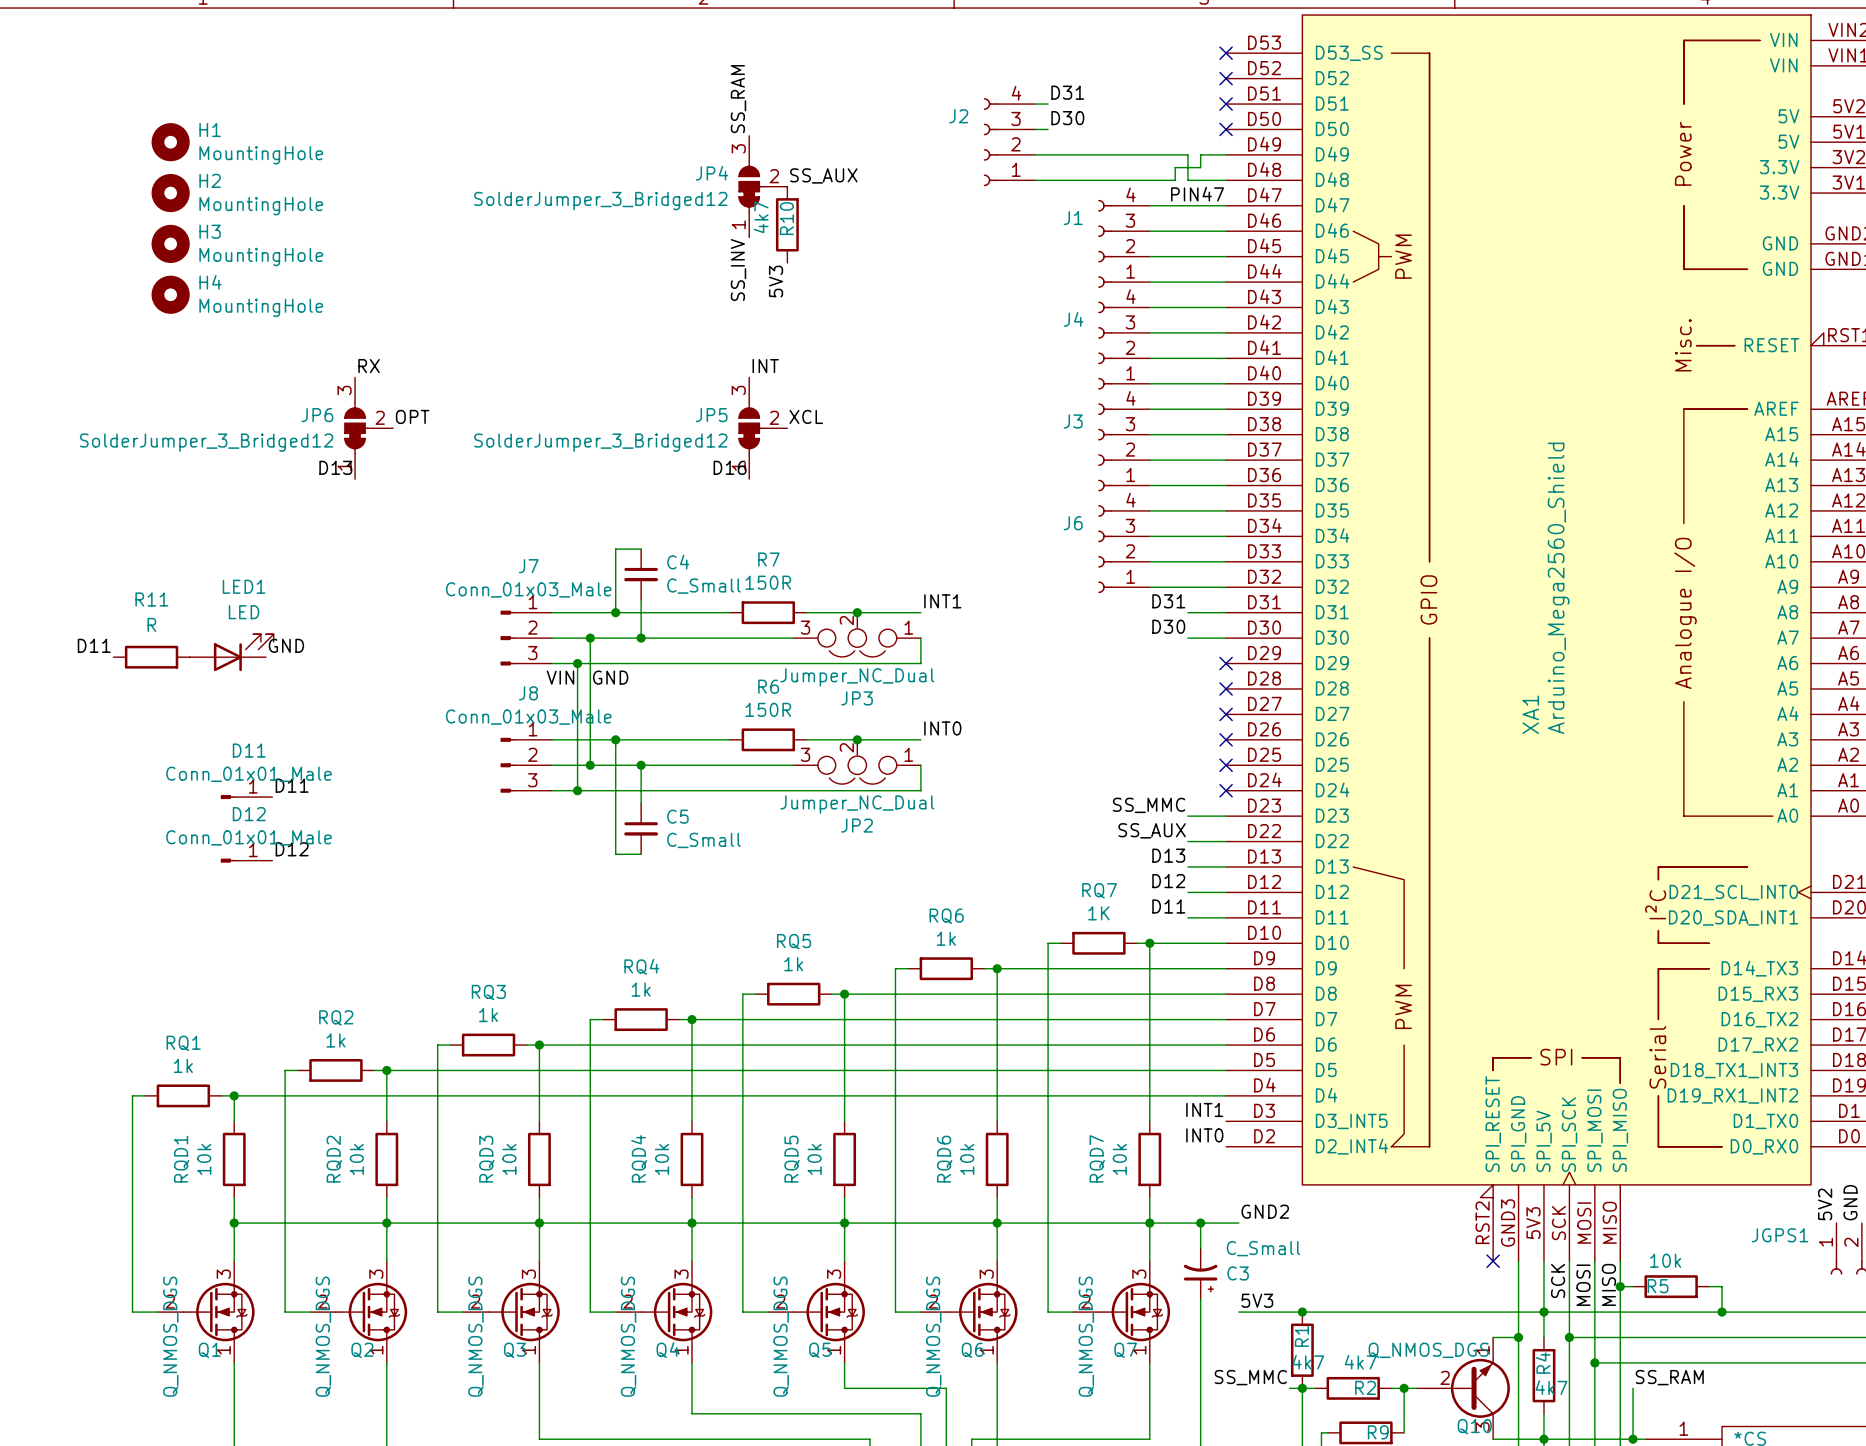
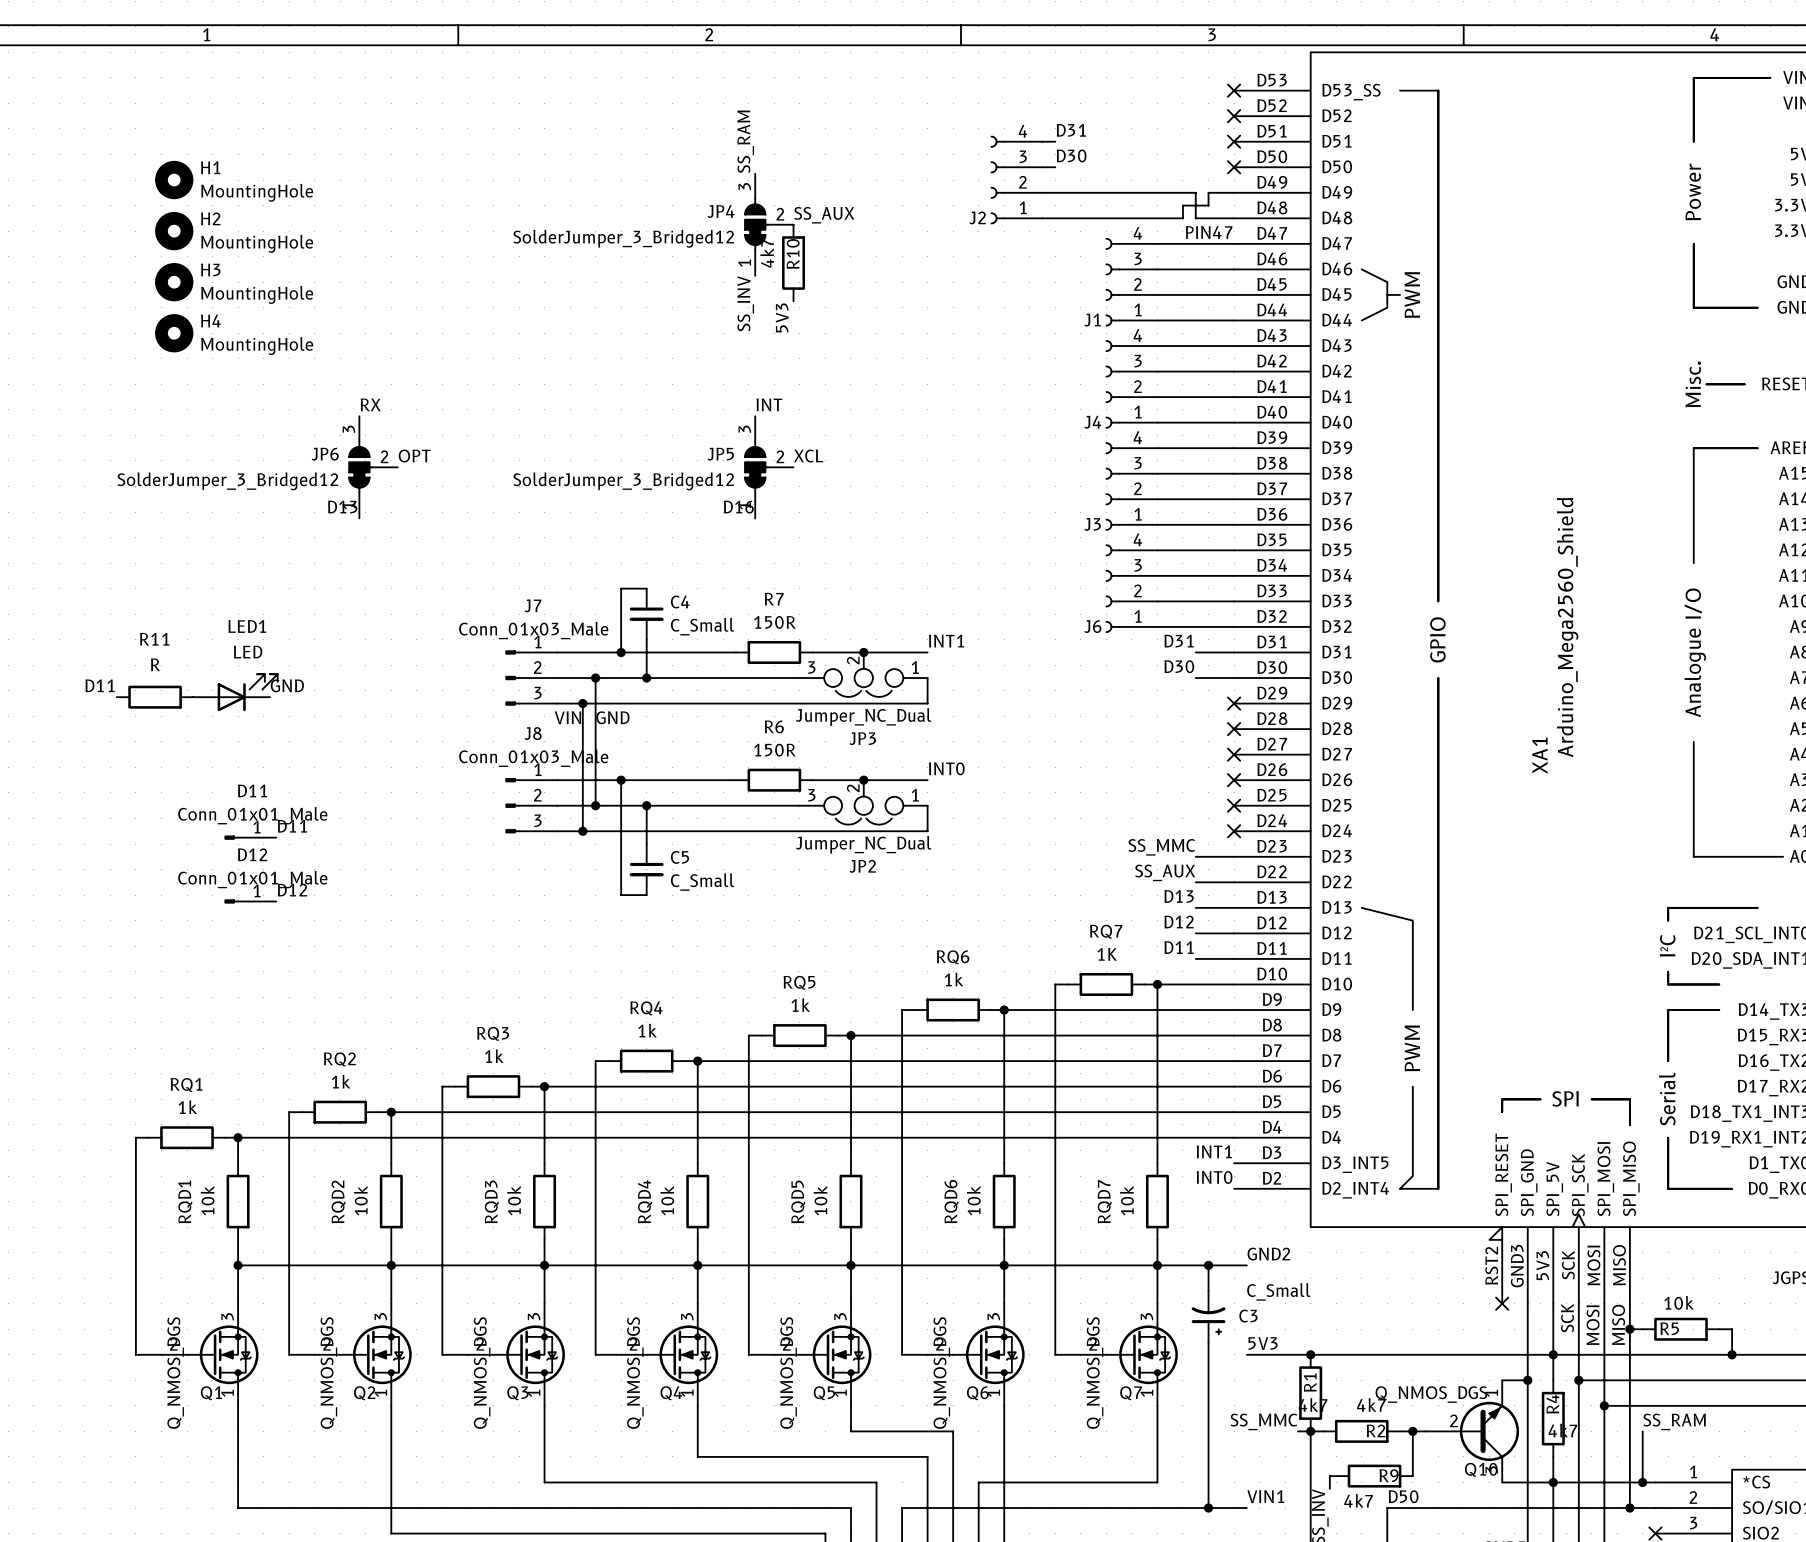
J2 name position: J2 (958, 116) -> J2 (977, 217)
J1 name position: J1 (1073, 218) -> J1 (1092, 320)
J4 name position: J4 (1073, 319) -> J4 (1092, 422)
J3 name position: J3 (1073, 421) -> J3 (1092, 524)
J6 name position: J6 (1073, 523) -> J6 (1092, 626)

